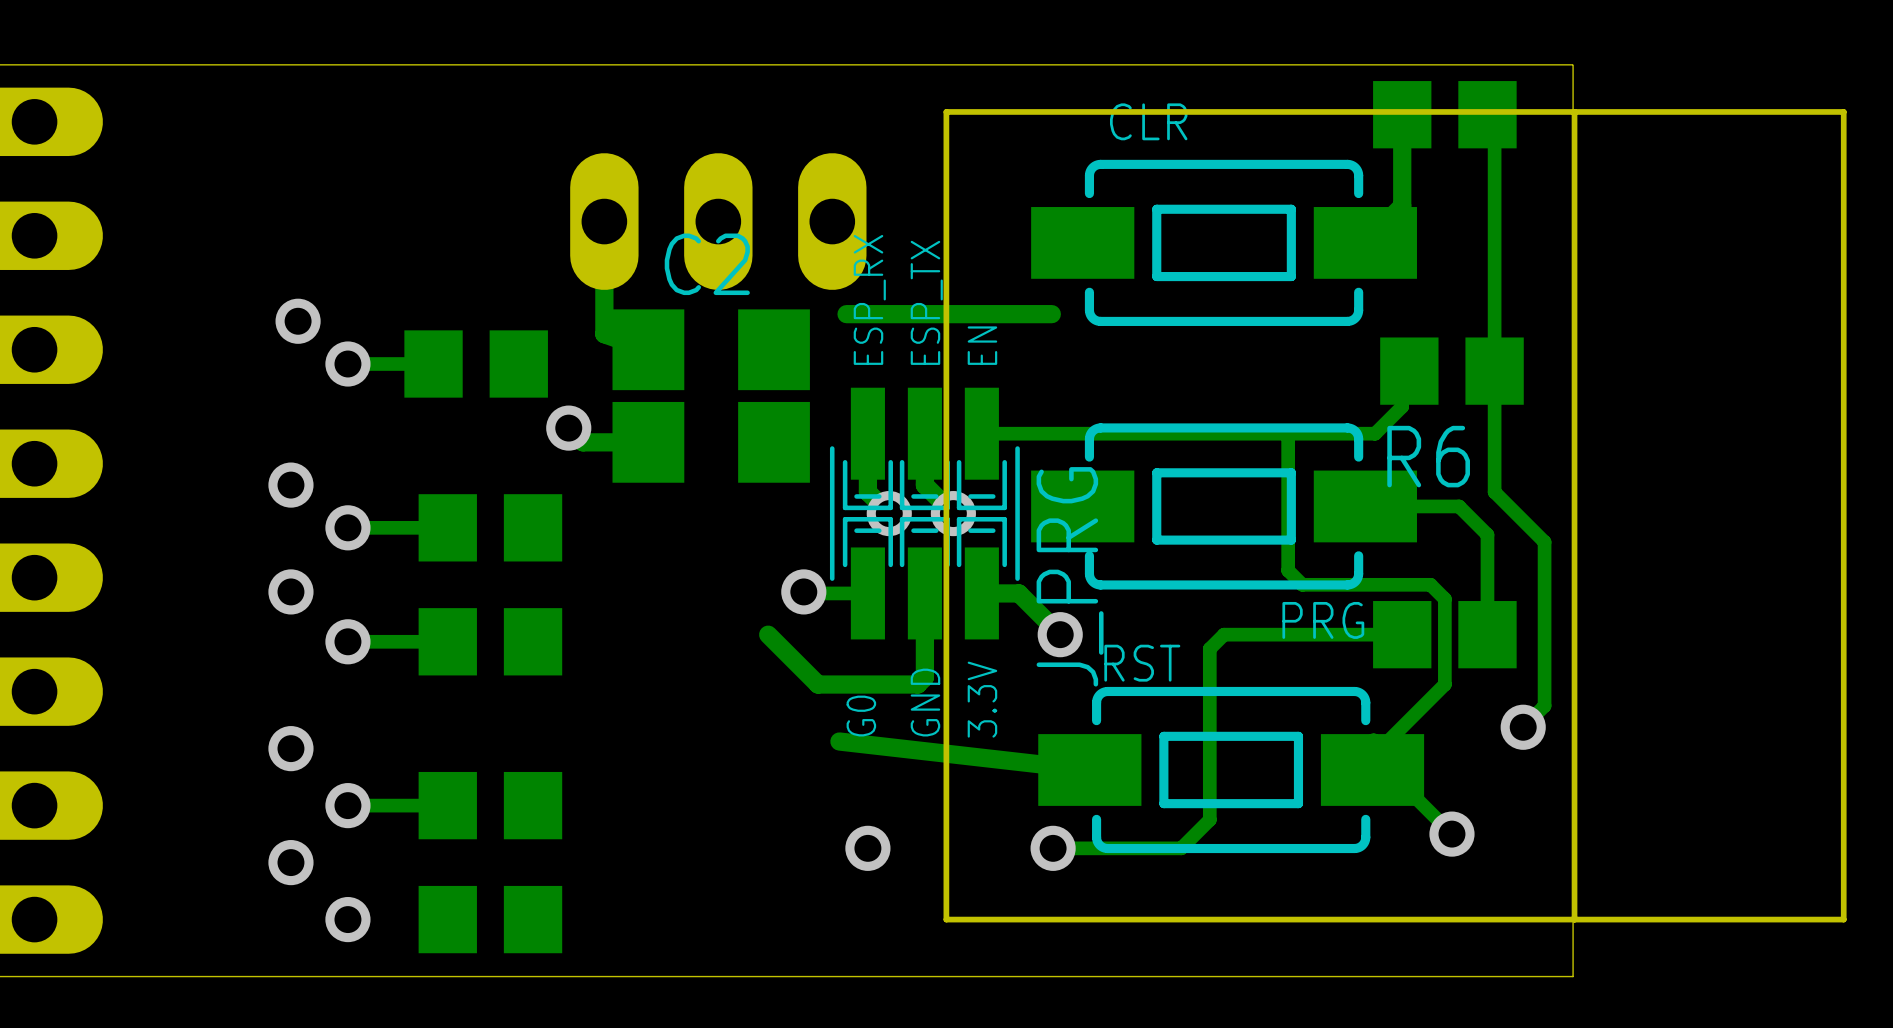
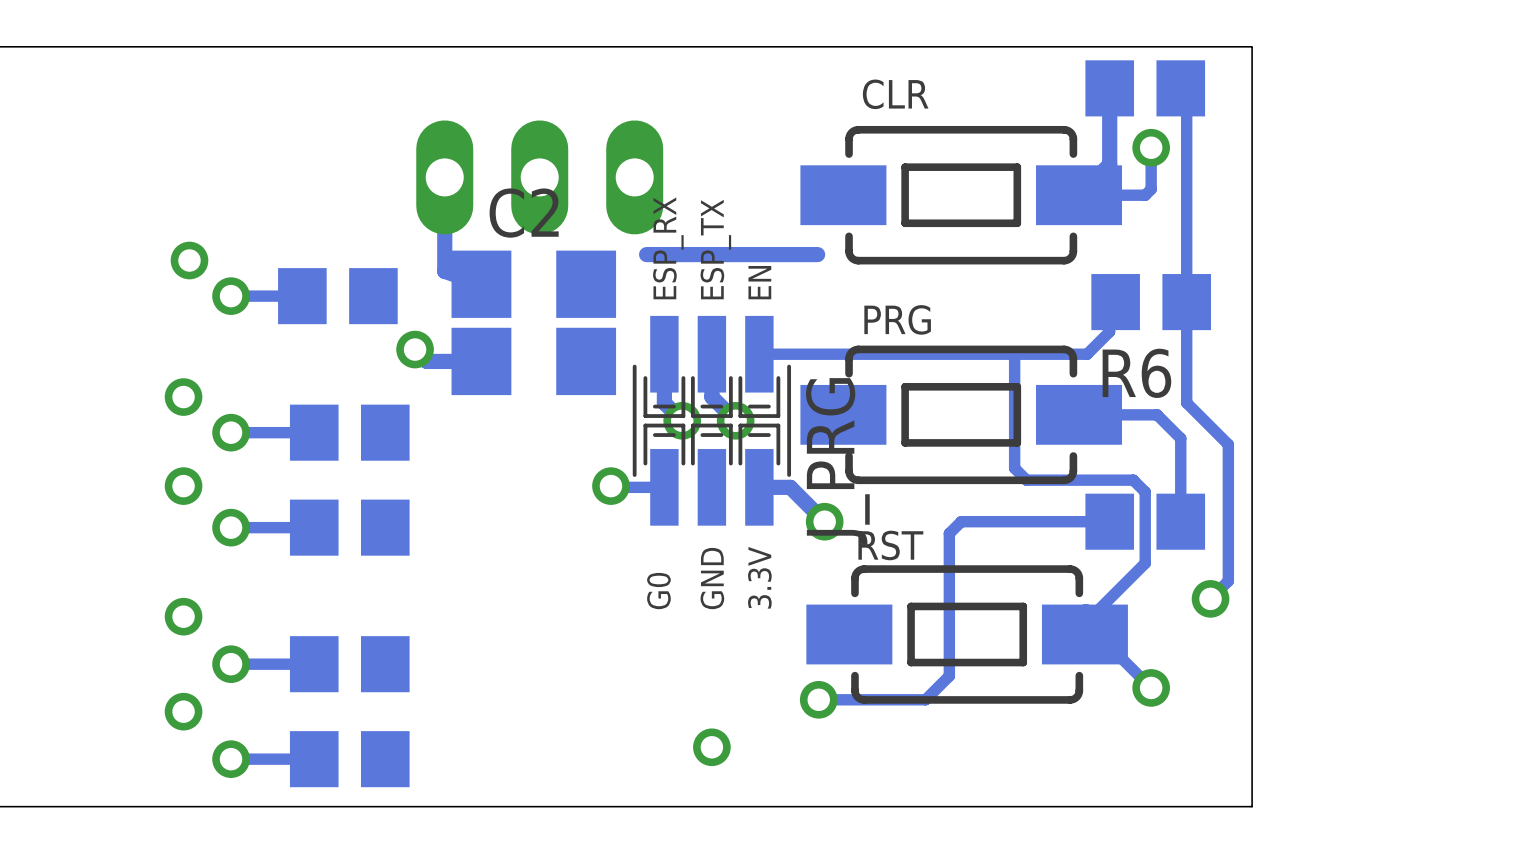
track: none -> (1151, 147) (1151, 189) (1145, 195) (1079, 195)
via: none -> (1151, 147)
part: (1395, 515) -> none
track: (924, 593) (924, 677) (917, 684) (818, 684) (768, 634) -> none
PRG name position: PRG (1323, 620) -> PRG (897, 319)
track: (839, 741) (1089, 770) -> none
via position: (867, 848) -> (711, 747)
track: none -> (314, 759) (231, 759)

